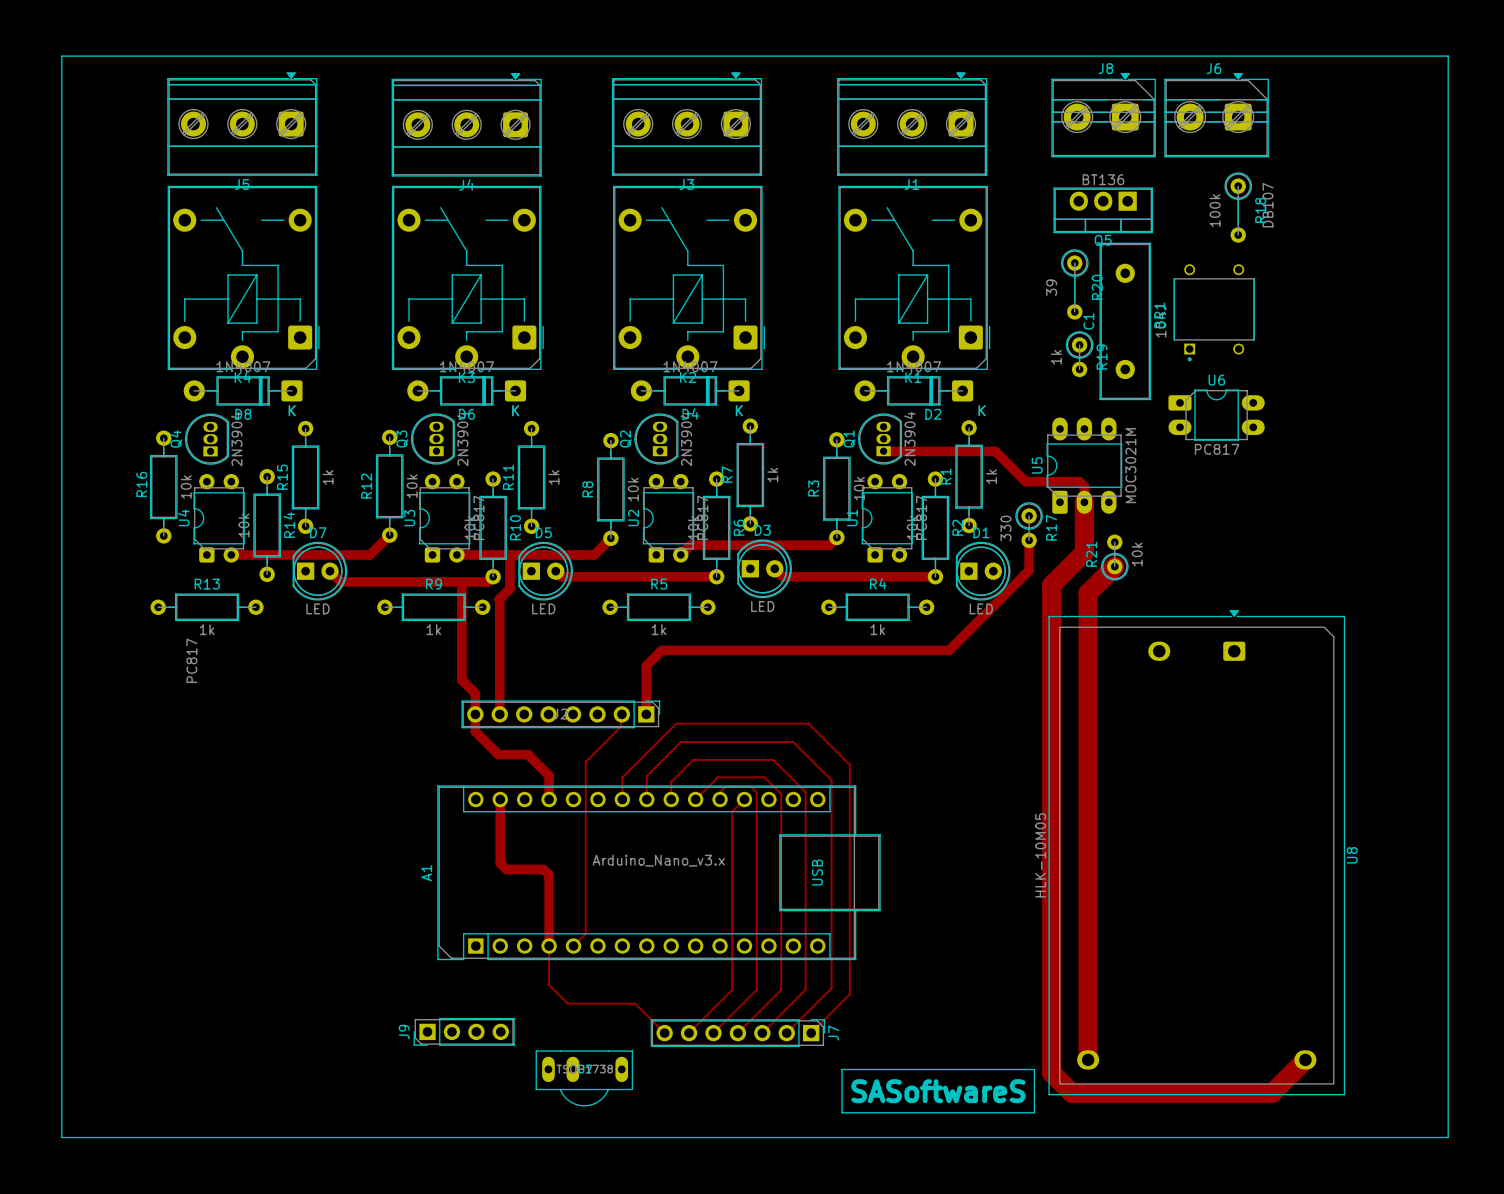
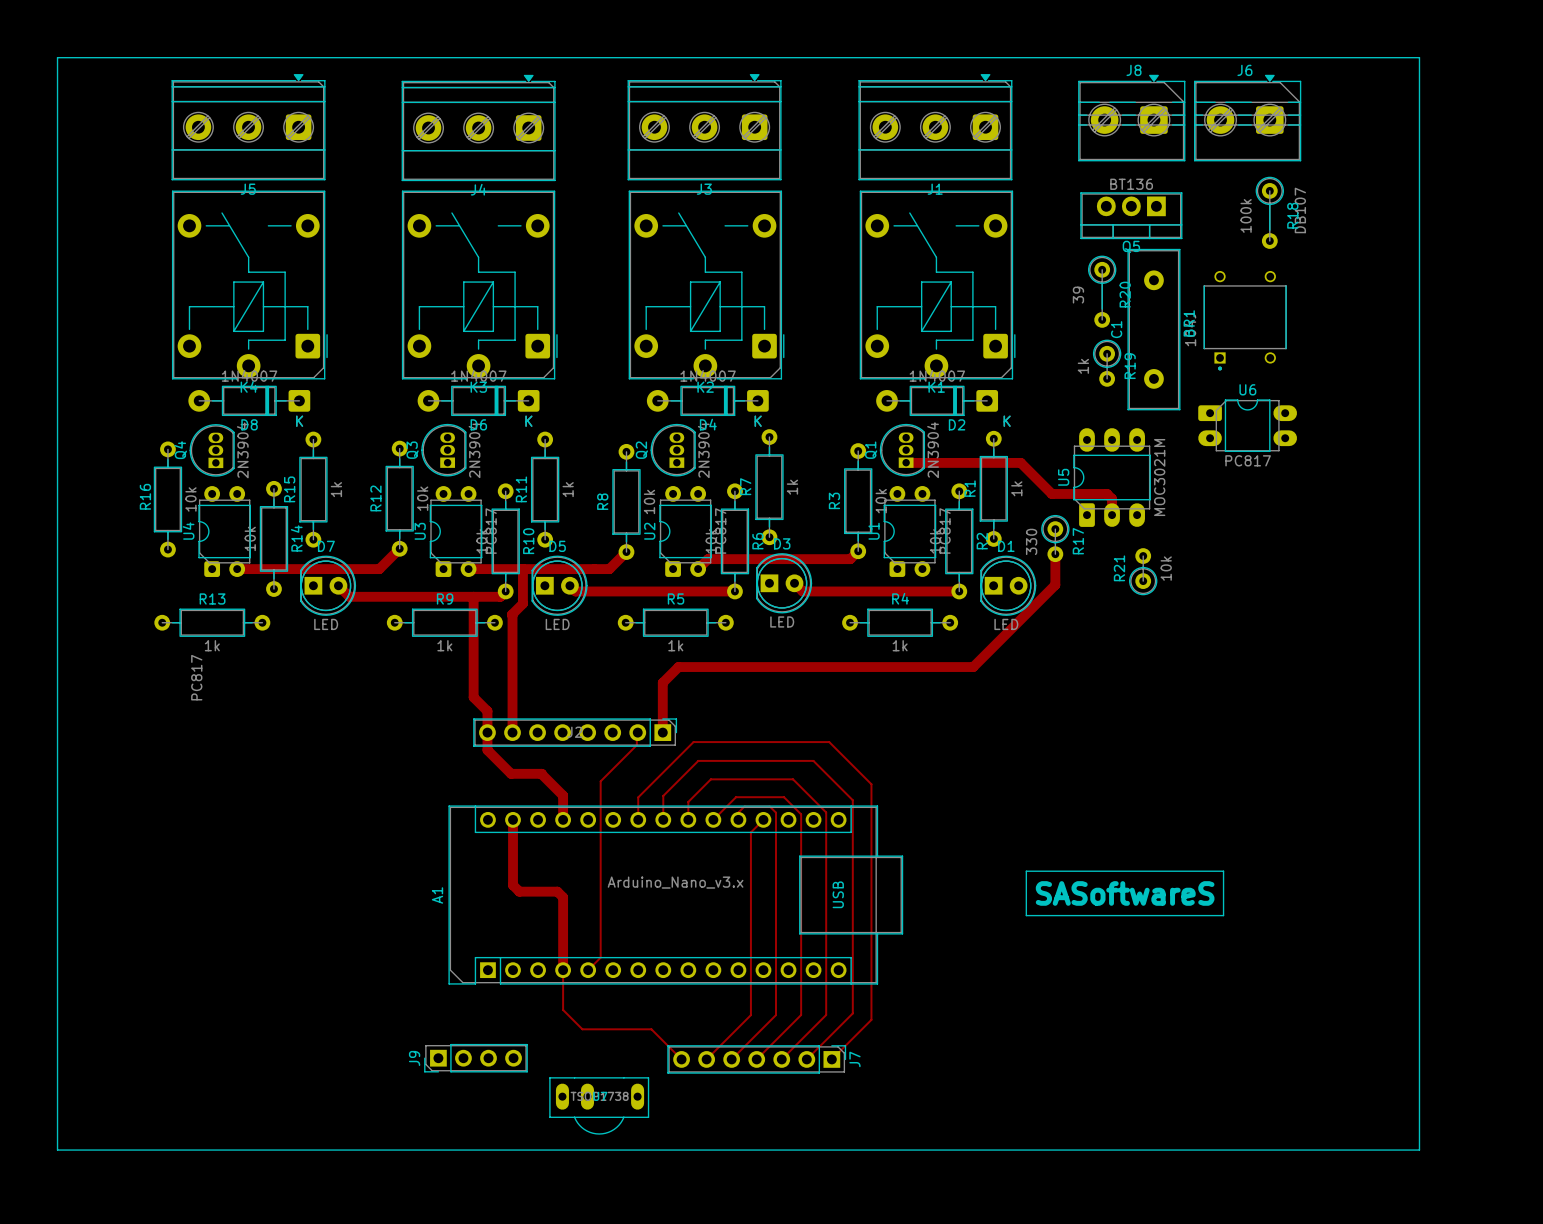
line: (61, 56) (1448, 56) (1448, 1137) (61, 1137) (61, 56) -> (57, 57) (57, 1150) (1419, 1150) (1419, 57) (57, 57)
track: (1084, 502) (1084, 552) (1051, 585) (1051, 1073) (1072, 1093) (1271, 1093) (1305, 1059) -> none
track: (1114, 566) (1088, 593) (1088, 1059) -> none
line: none -> (1026, 871) (1223, 871) (1223, 915) (1026, 915) (1026, 871)
U8: HLK-10M05 (1196, 852) -> none
text: none -> SASoftwareS (1125, 893)
line: (842, 1069) (1034, 1069) (1034, 1112) (842, 1112) (842, 1069) -> none
text: SASoftwareS (938, 1091) -> none

